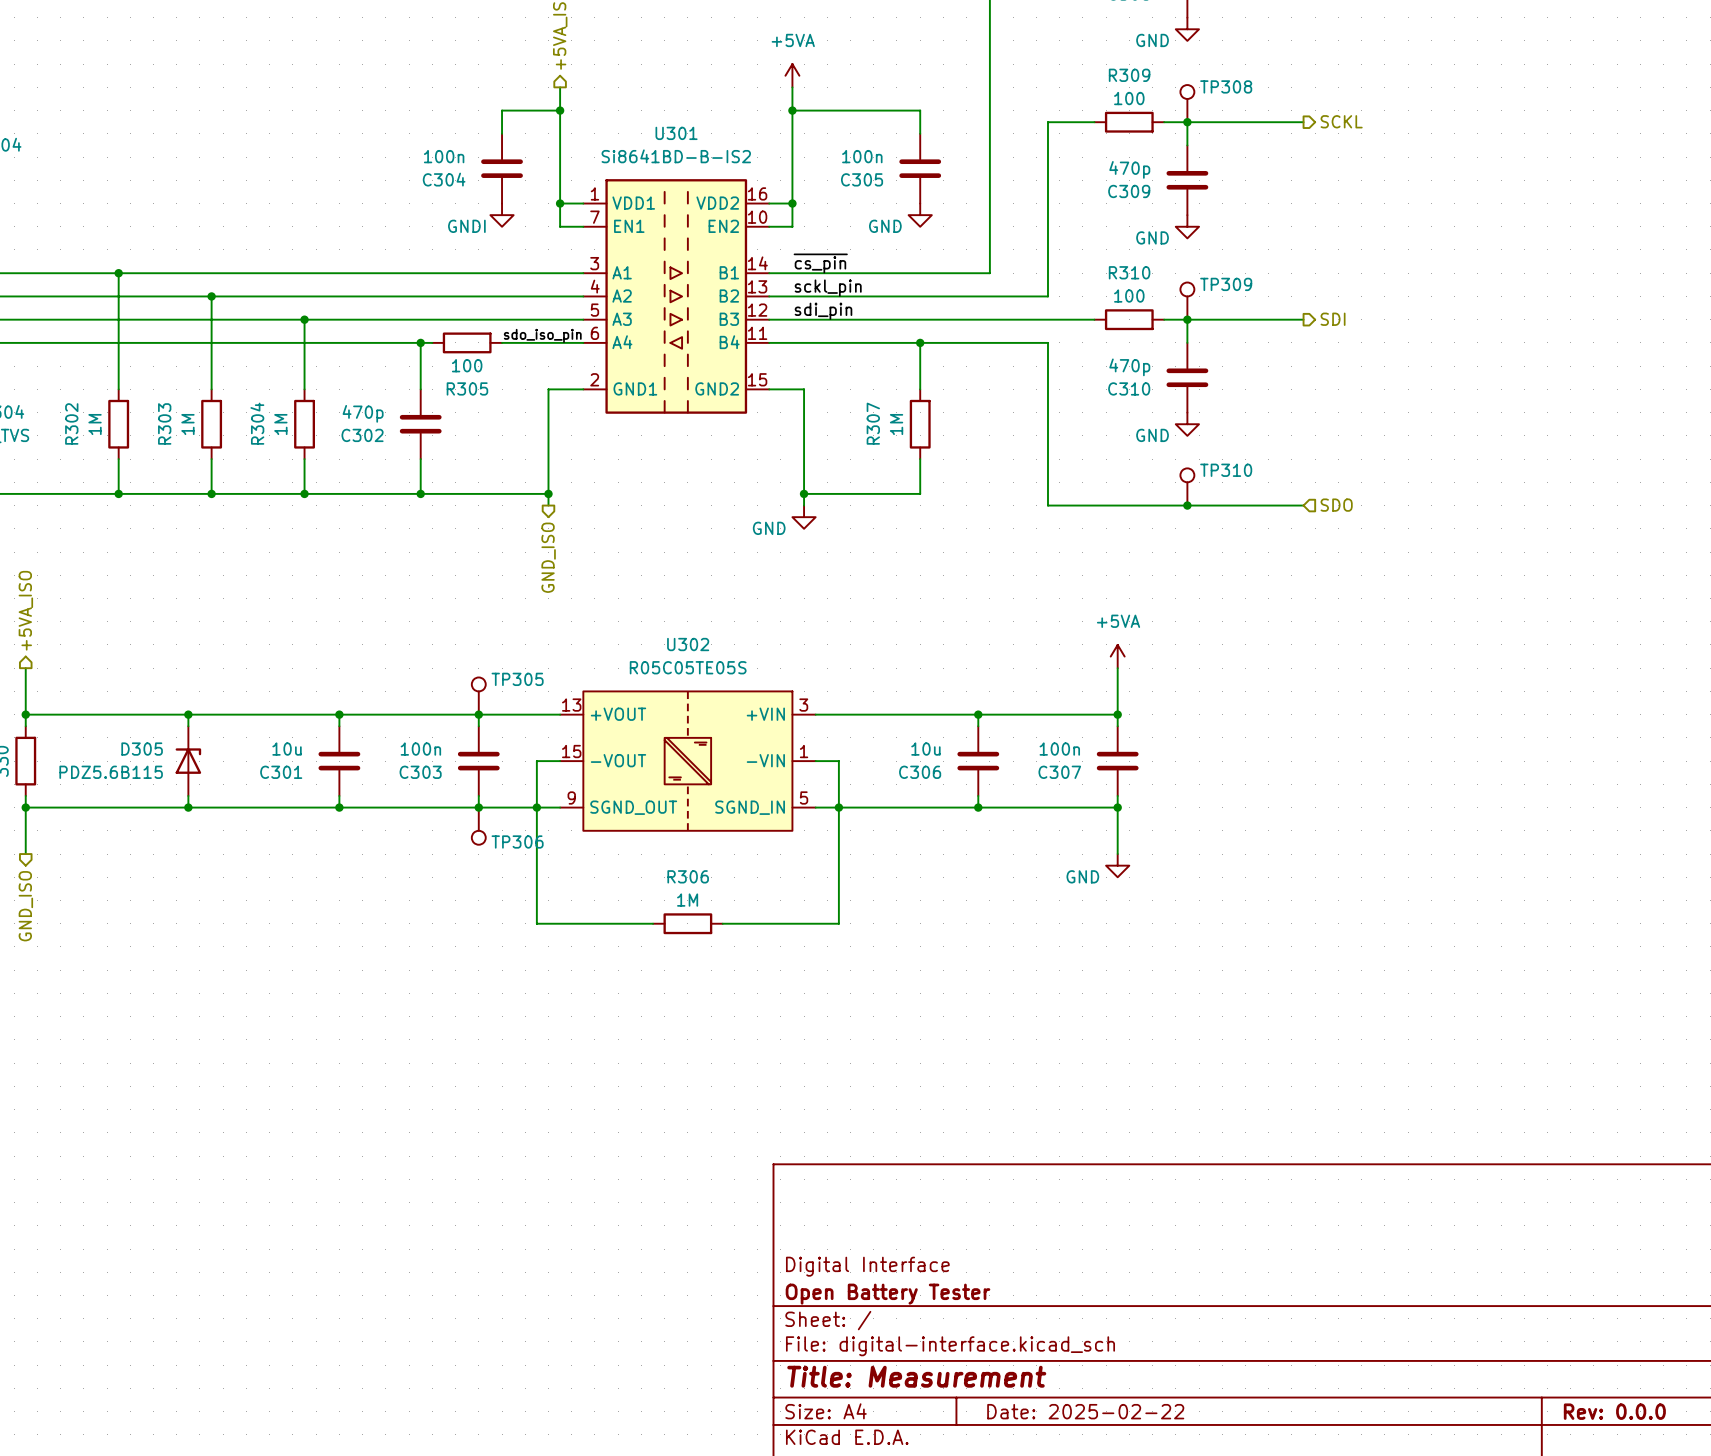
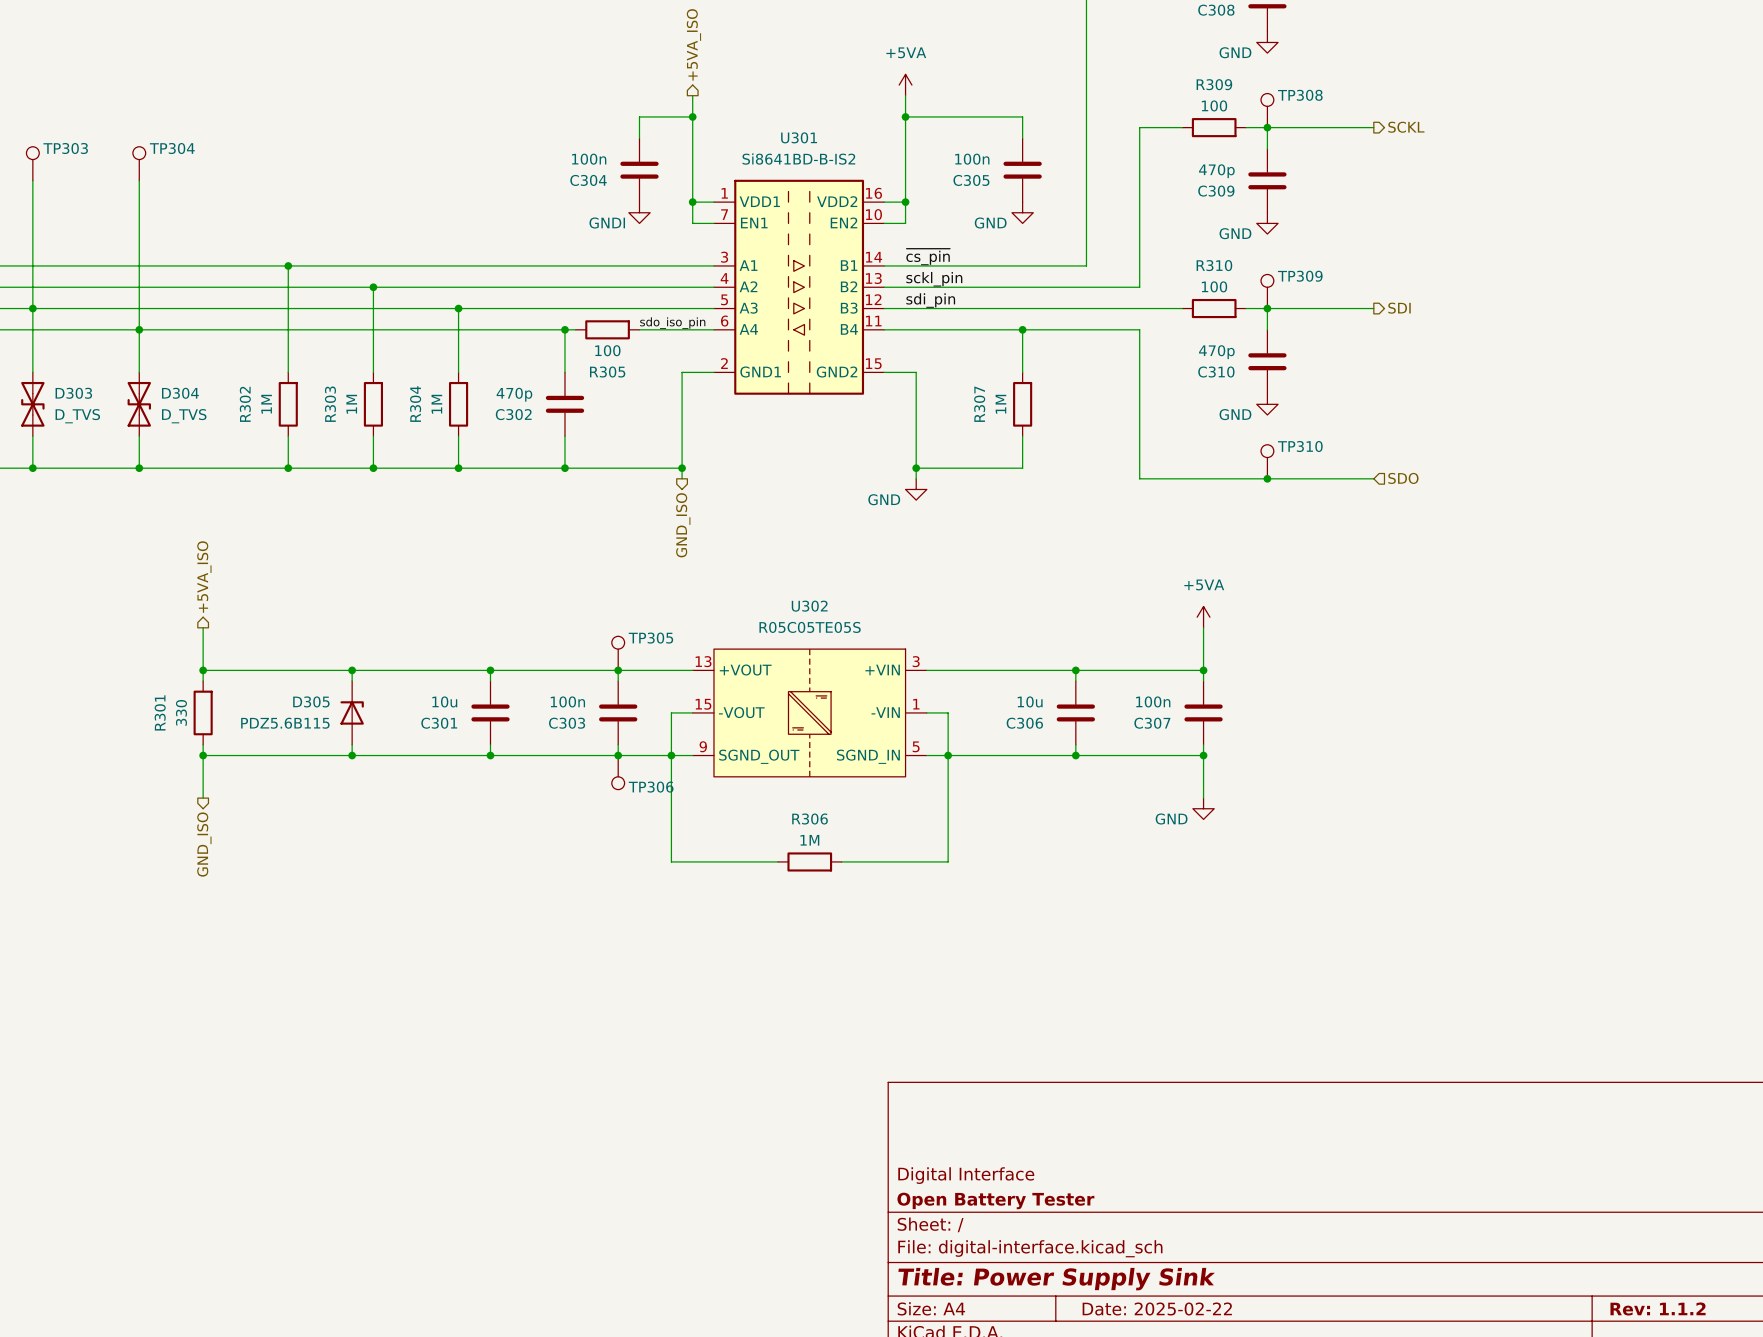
title block: Title: Measurement (916, 1376) -> Title: Power Supply Sink (1056, 1279)
title block: Rev: 0.0.0 (1614, 1411) -> Rev: 1.1.2 (1658, 1308)

